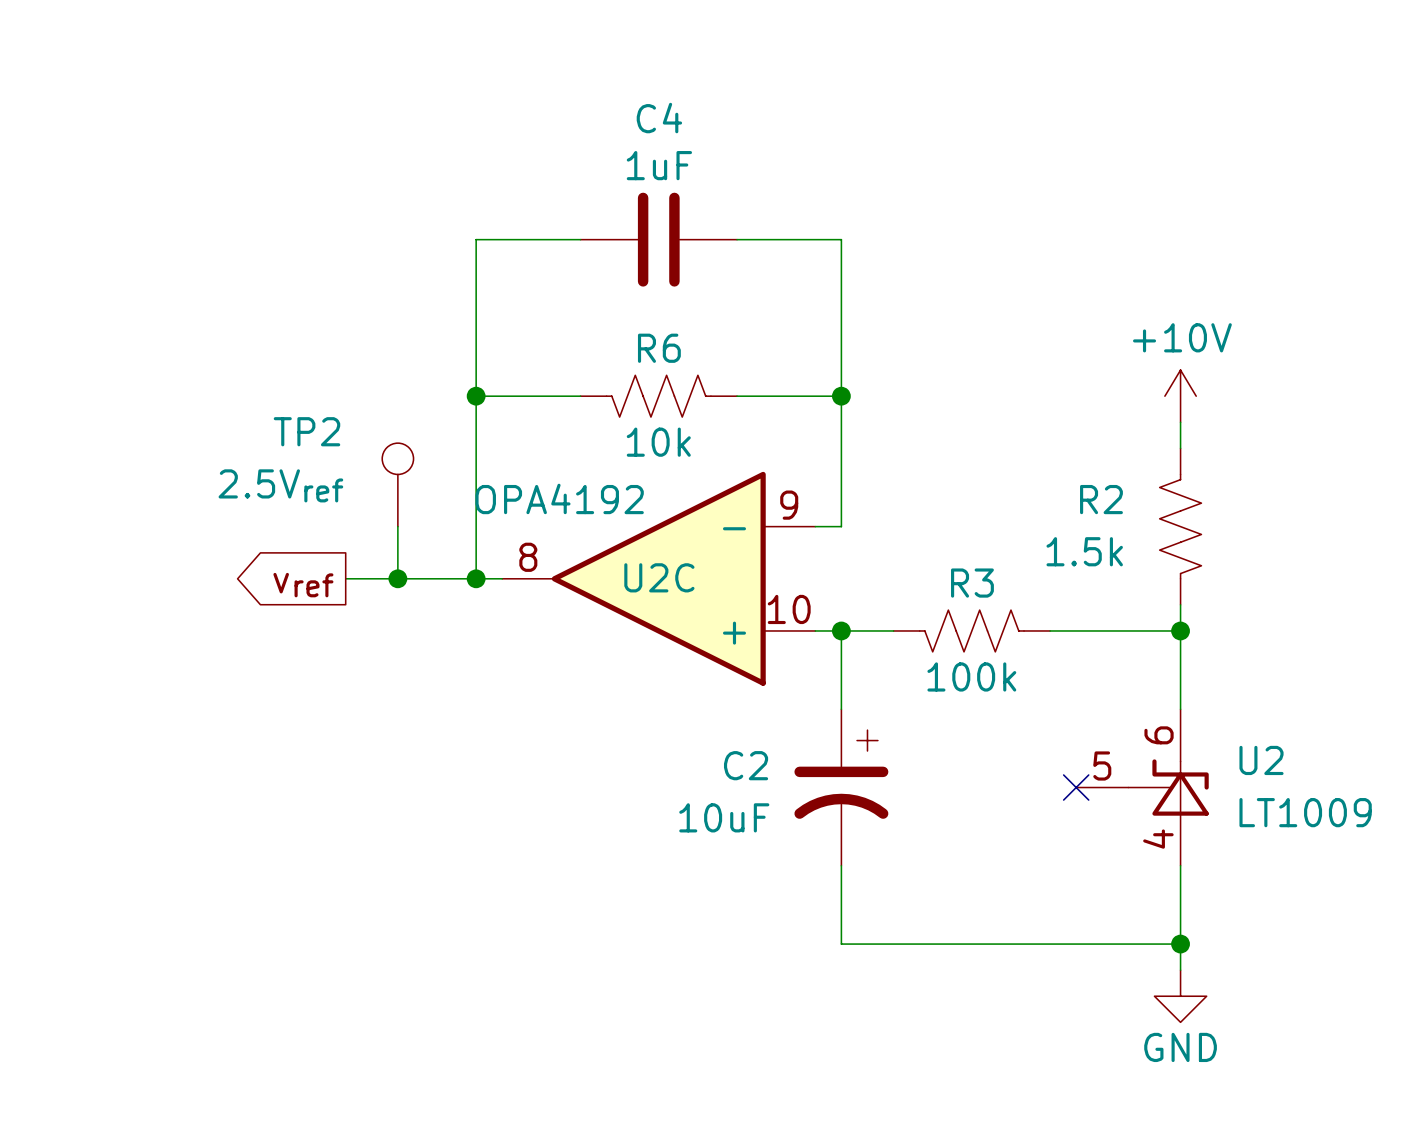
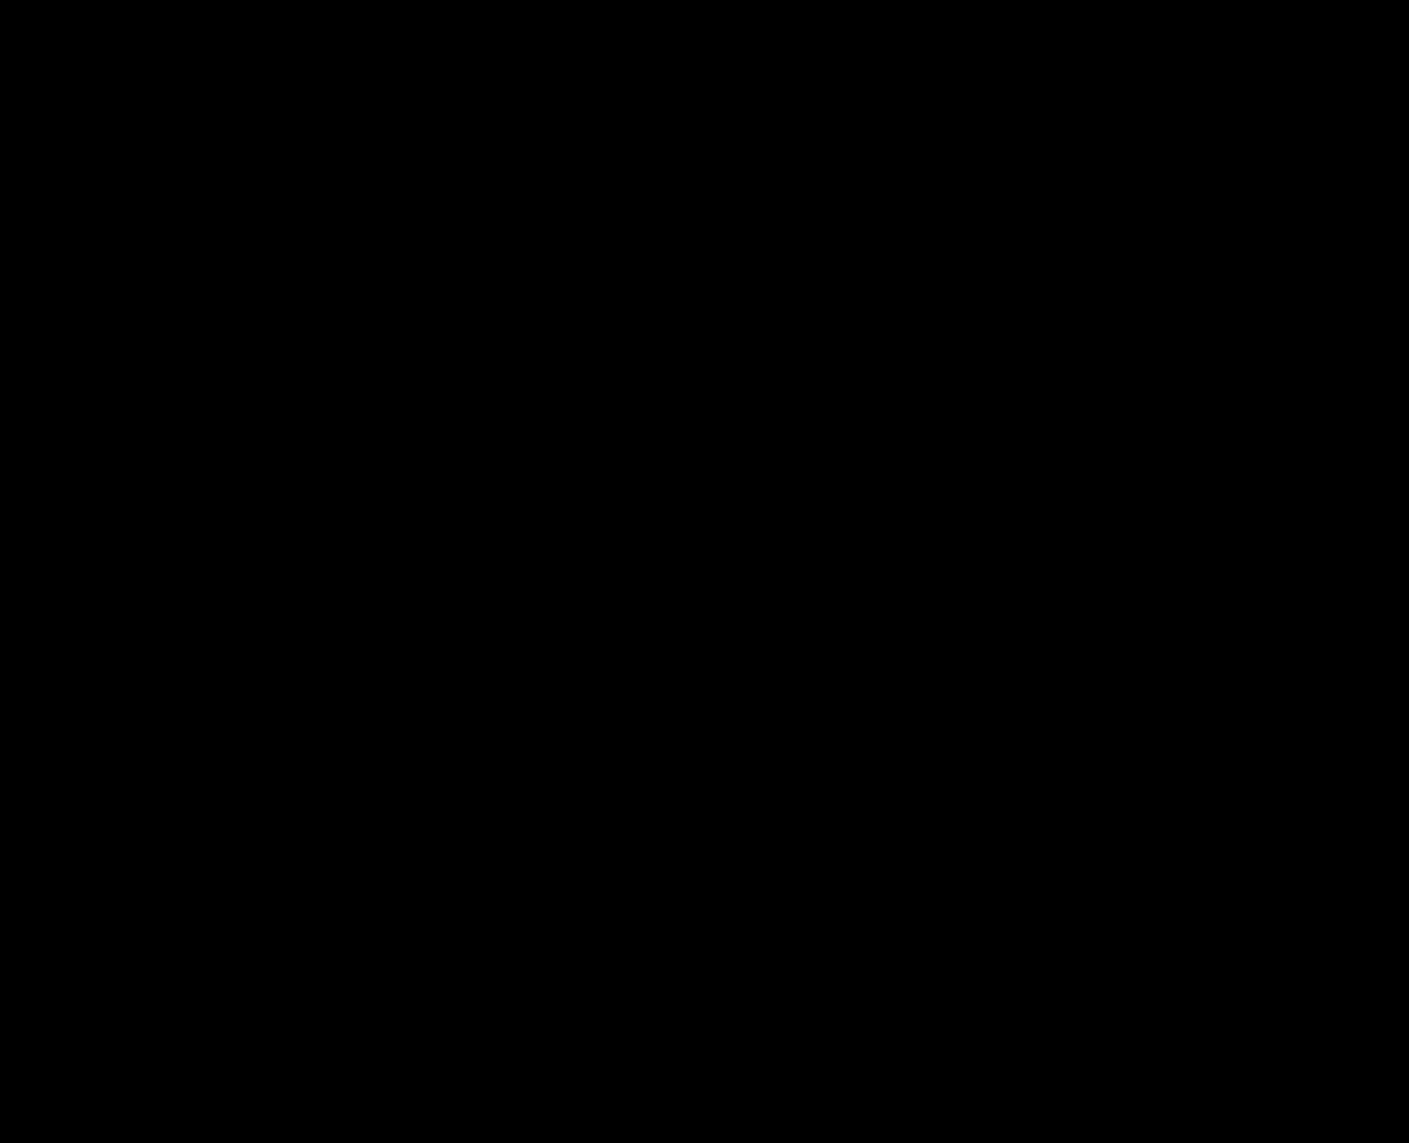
wire: (580, 239) (476, 239) (476, 578) -> none
C4: 1uF (658, 239) -> none
wire: (737, 239) (841, 239) (841, 526) (815, 526) -> none
wire: (476, 396) (580, 396) -> none
junction: (476, 396) -> none
R6: 10k (658, 396) -> none
wire: (737, 396) (841, 396) -> none
junction: (841, 396) -> none
power symbol: +10V (1180, 396) -> none
wire: (1180, 422) (1180, 448) -> none
TP2: 2.5Vref (397, 484) -> none
wire: (397, 526) (397, 578) -> none
R2: 1.5k (1180, 526) -> none
wire: (345, 578) (502, 578) -> none
junction: (397, 578) -> none
junction: (476, 578) -> none
U2C: OPA4192 (658, 578) -> none
global label: vref (303, 585) -> none
wire: (1180, 604) (1180, 709) -> none
wire: (815, 630) (893, 630) -> none
wire: (841, 630) (841, 709) -> none
junction: (841, 630) -> none
R3: 100k (971, 630) -> none
wire: (1050, 630) (1180, 630) -> none
junction: (1180, 630) -> none
C2: 10uF (841, 787) -> none
no-connect mark: (1076, 787) -> none
U2: LT1009 (1142, 787) -> none
wire: (841, 865) (841, 944) (1180, 944) -> none
wire: (1180, 865) (1180, 970) -> none
junction: (1180, 944) -> none
power symbol: GND (1180, 996) -> none

